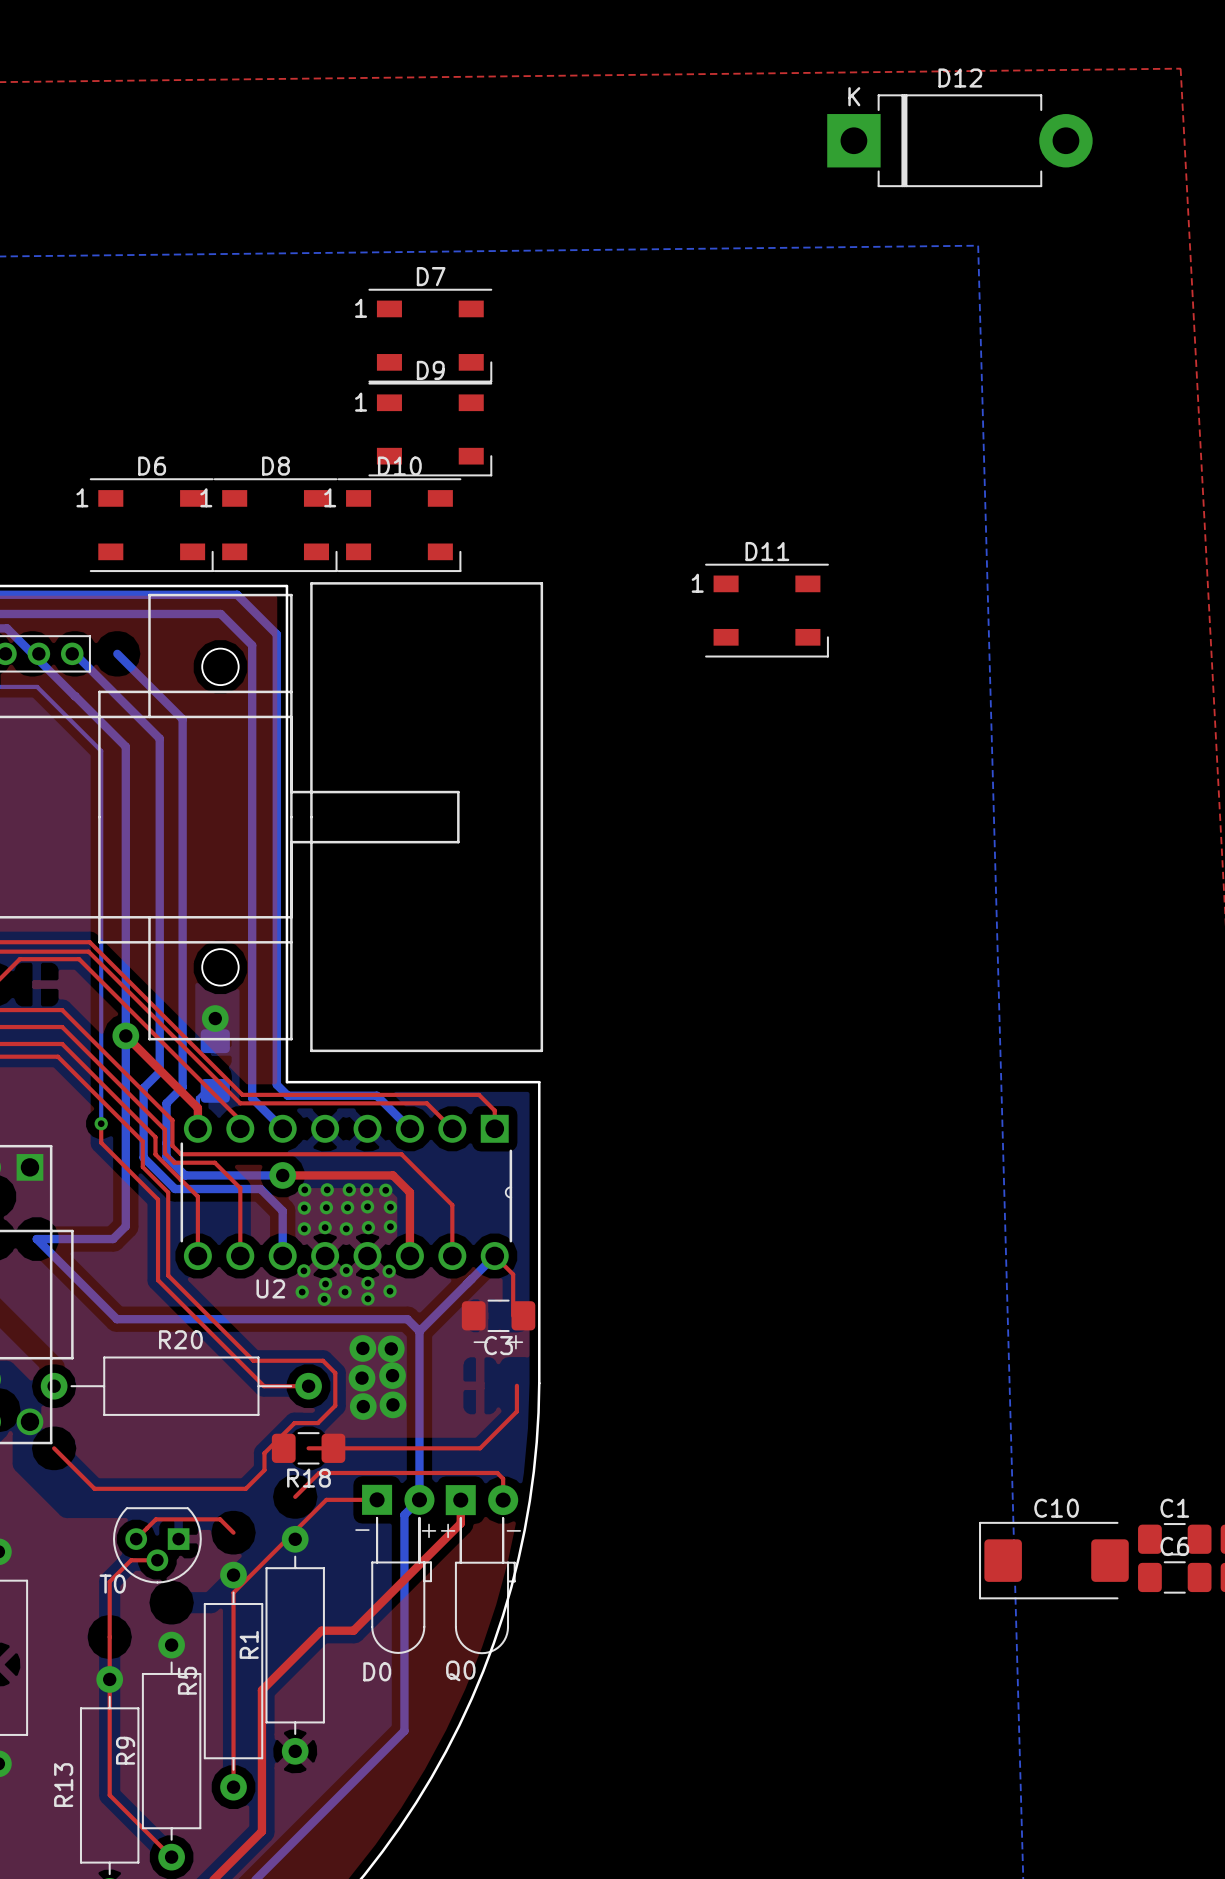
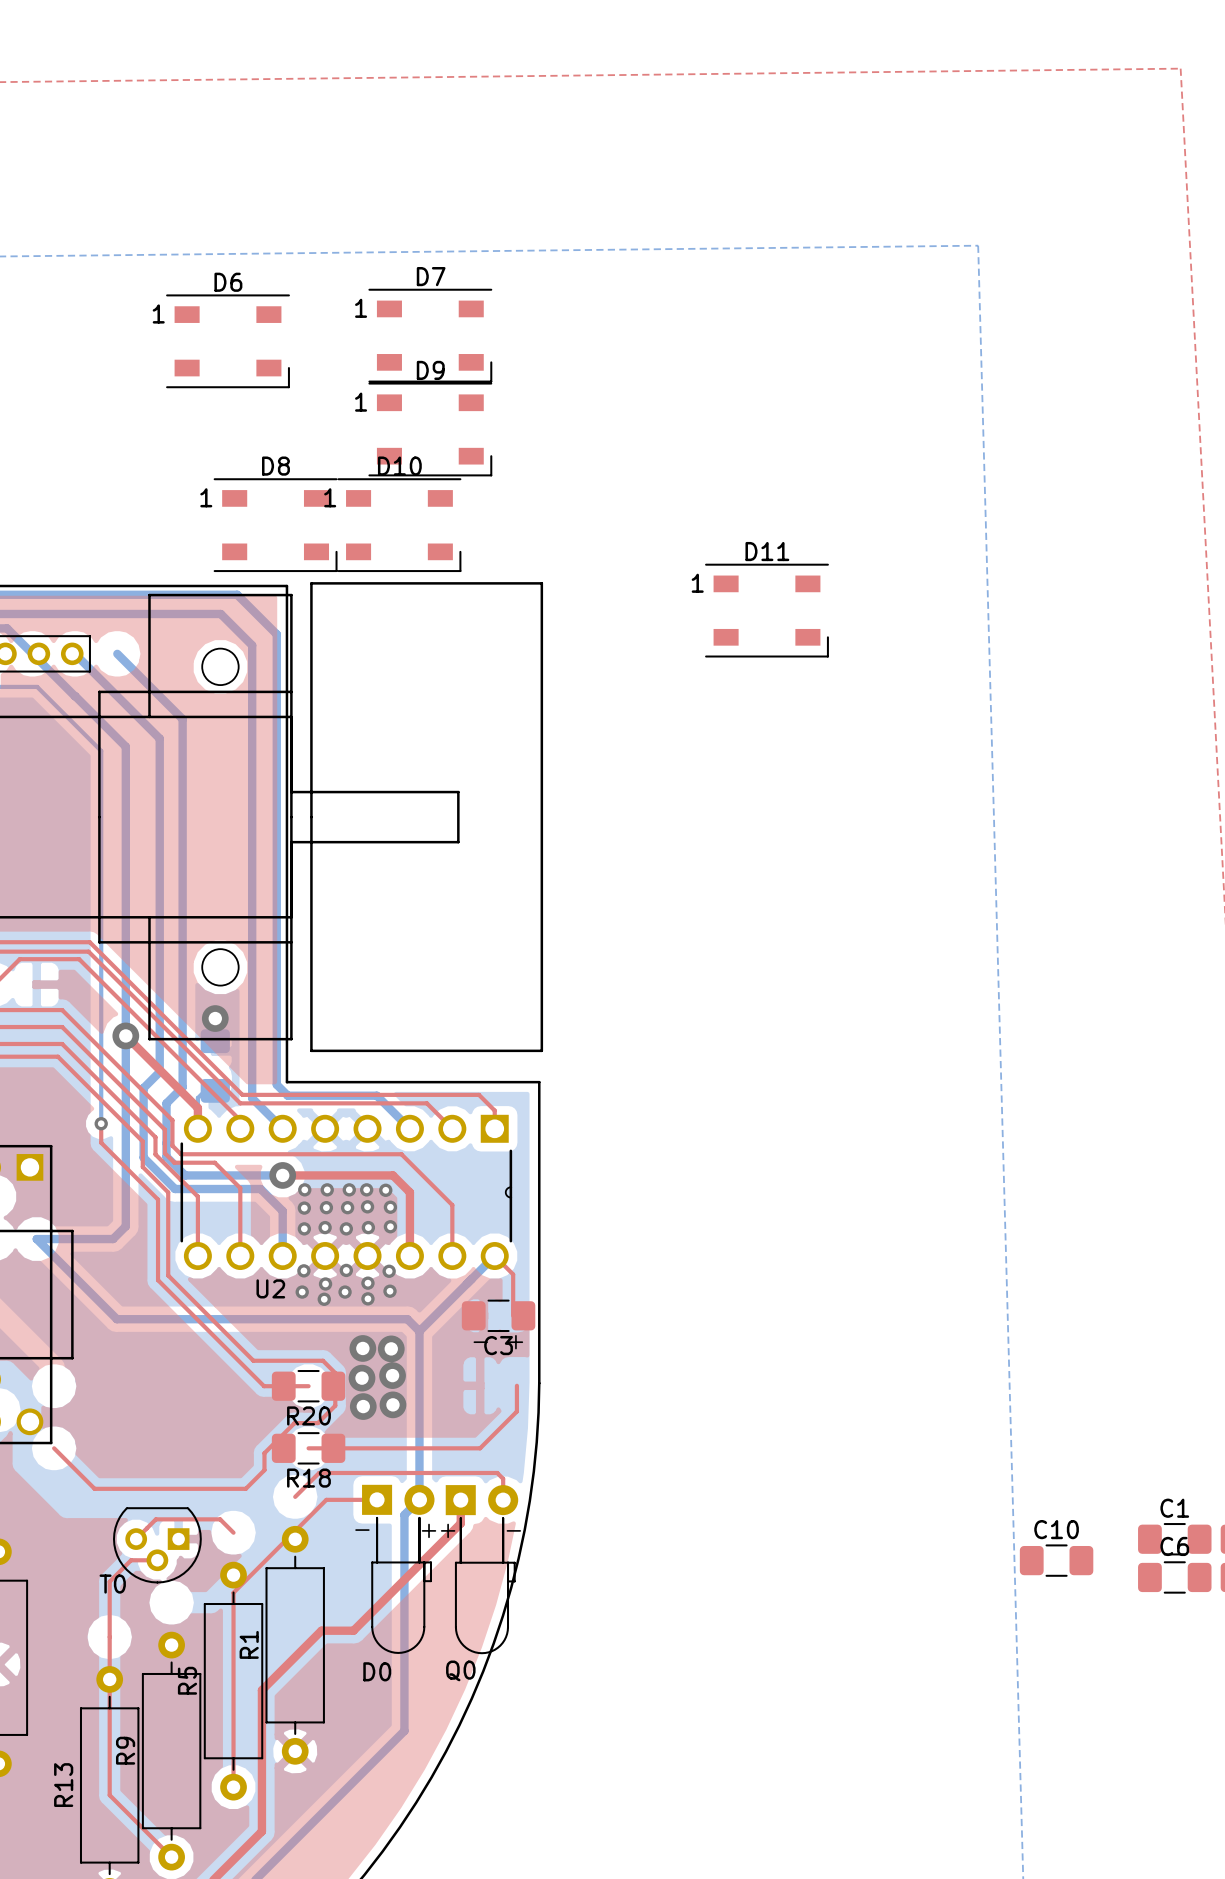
D12: (959, 140) -> none
D6 position: (151, 525) -> (228, 341)
R20 name position: R20 (180, 1339) -> R20 (308, 1415)
R20 footprint: [40, 1356, 322, 1416] -> [271, 1370, 346, 1403]
C10 footprint: [979, 1521, 1129, 1600] -> [1019, 1544, 1094, 1577]

